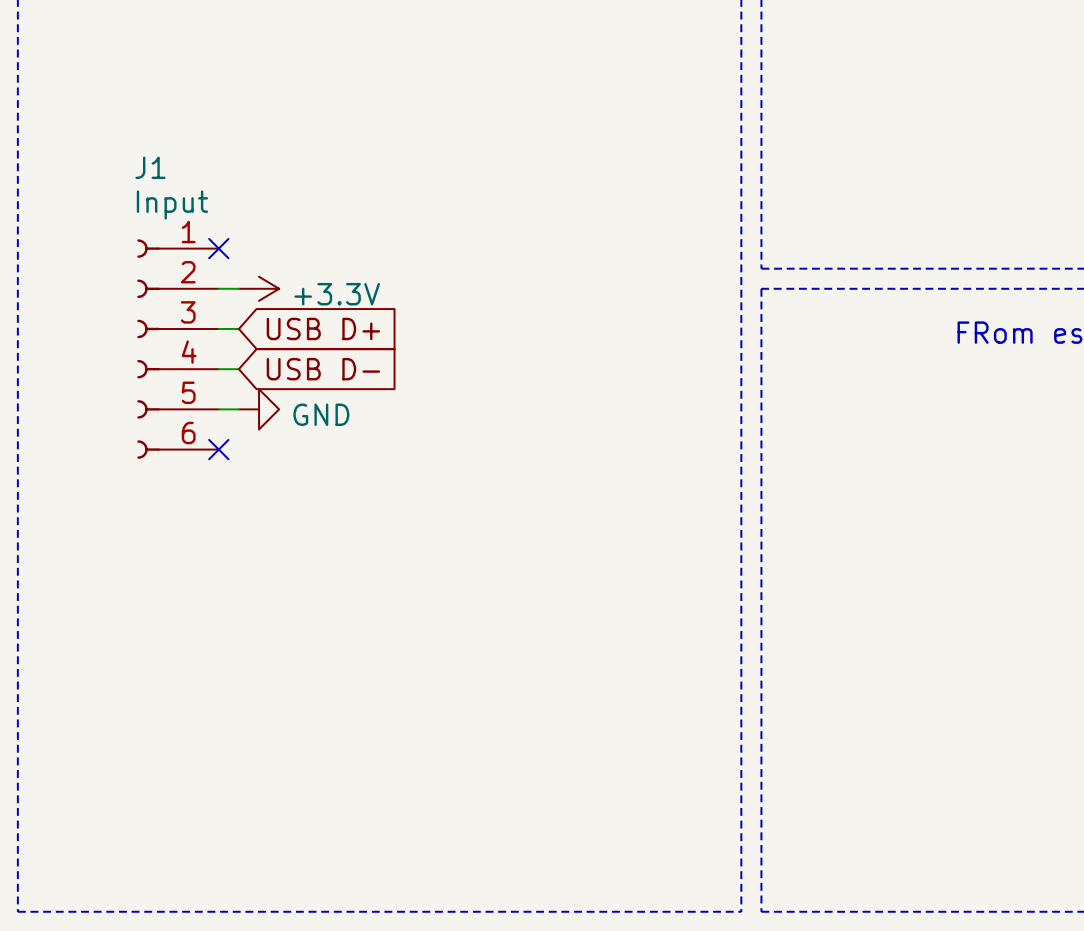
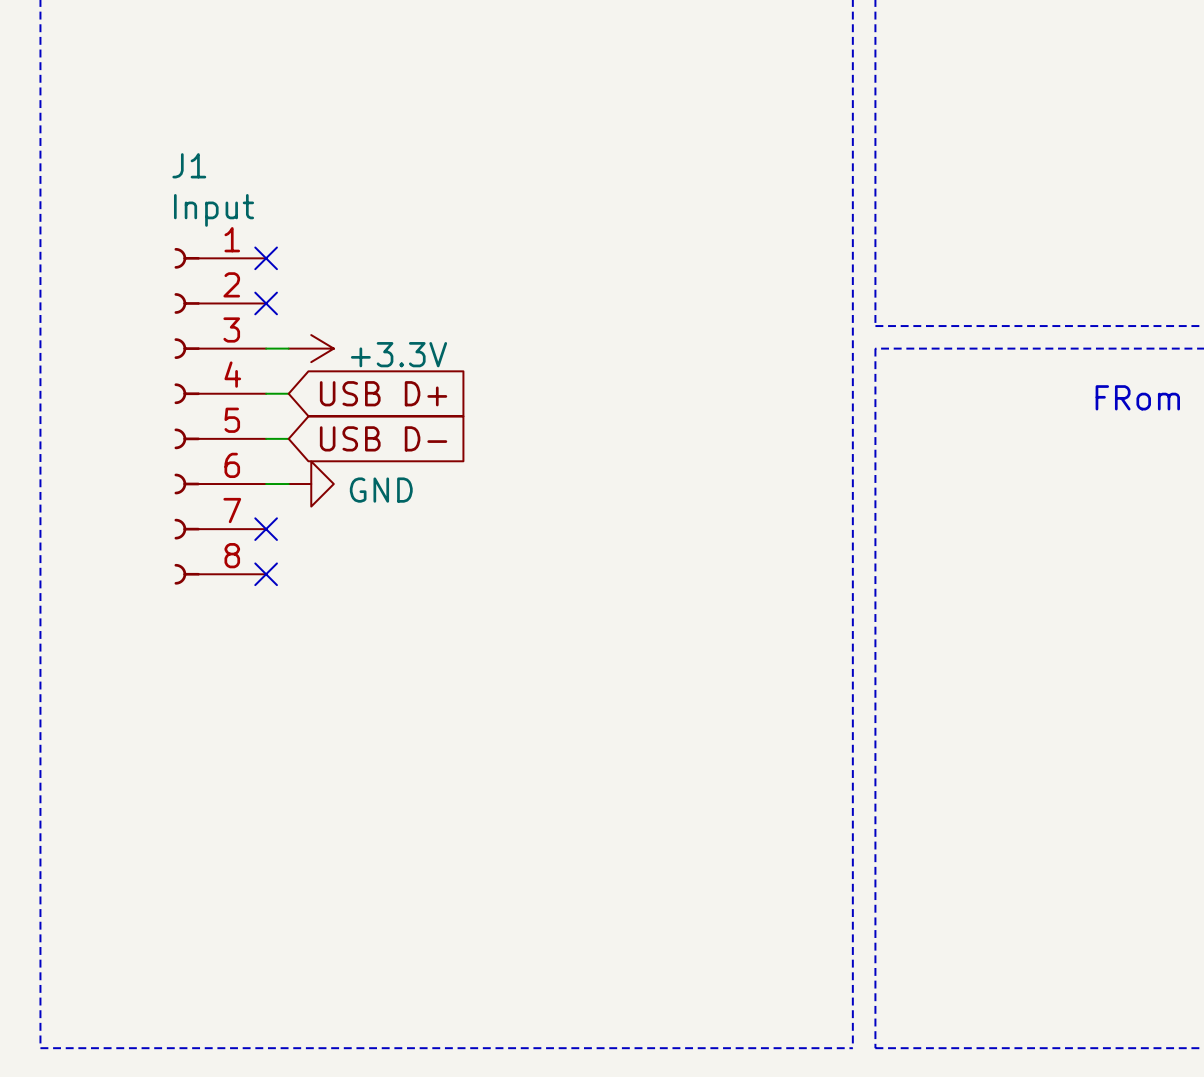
J1 name position: J1 (150, 167) -> J1 (189, 165)
J1 value position: Input (172, 205) -> Input (214, 210)
no-connect mark: none -> (266, 258)
J1 symbol: [137, 239, 219, 459] -> [174, 247, 267, 585]
no-connect mark: none -> (266, 574)

